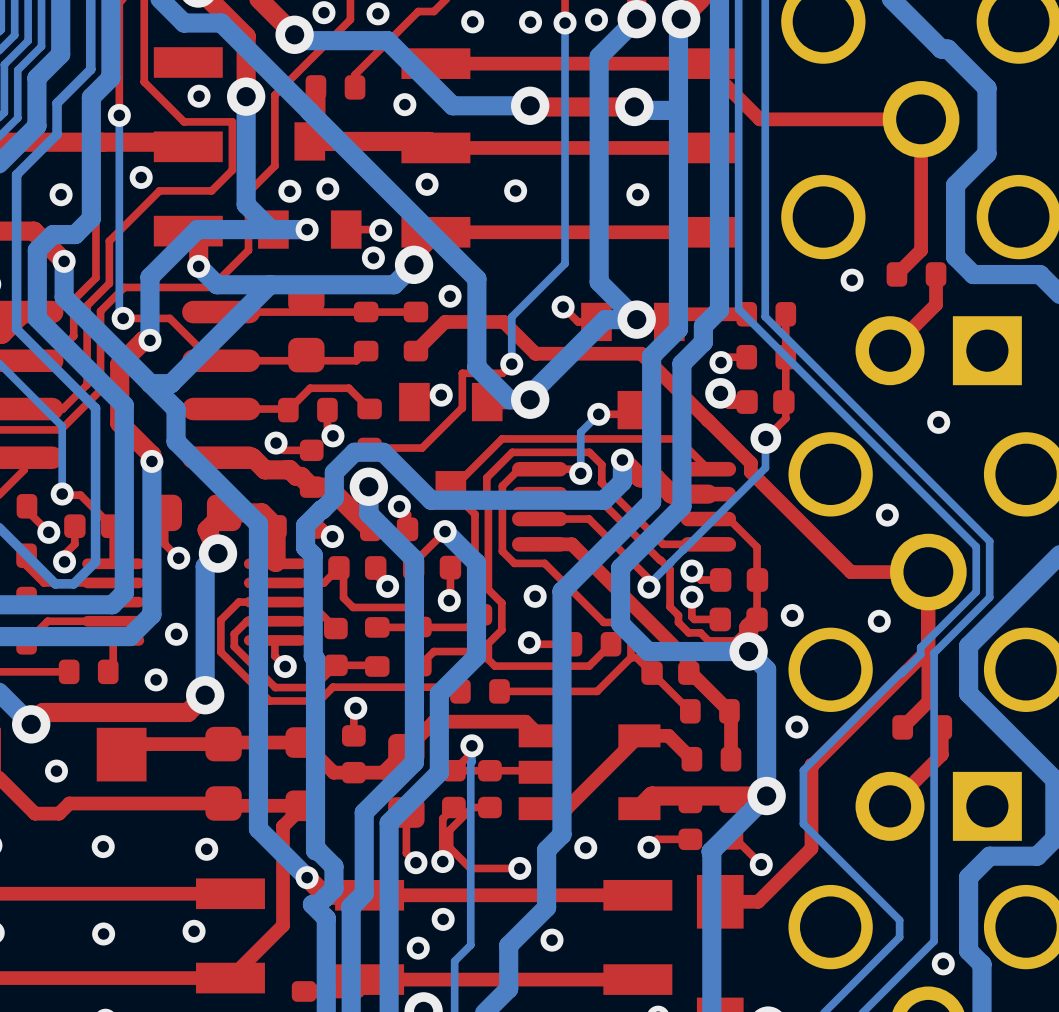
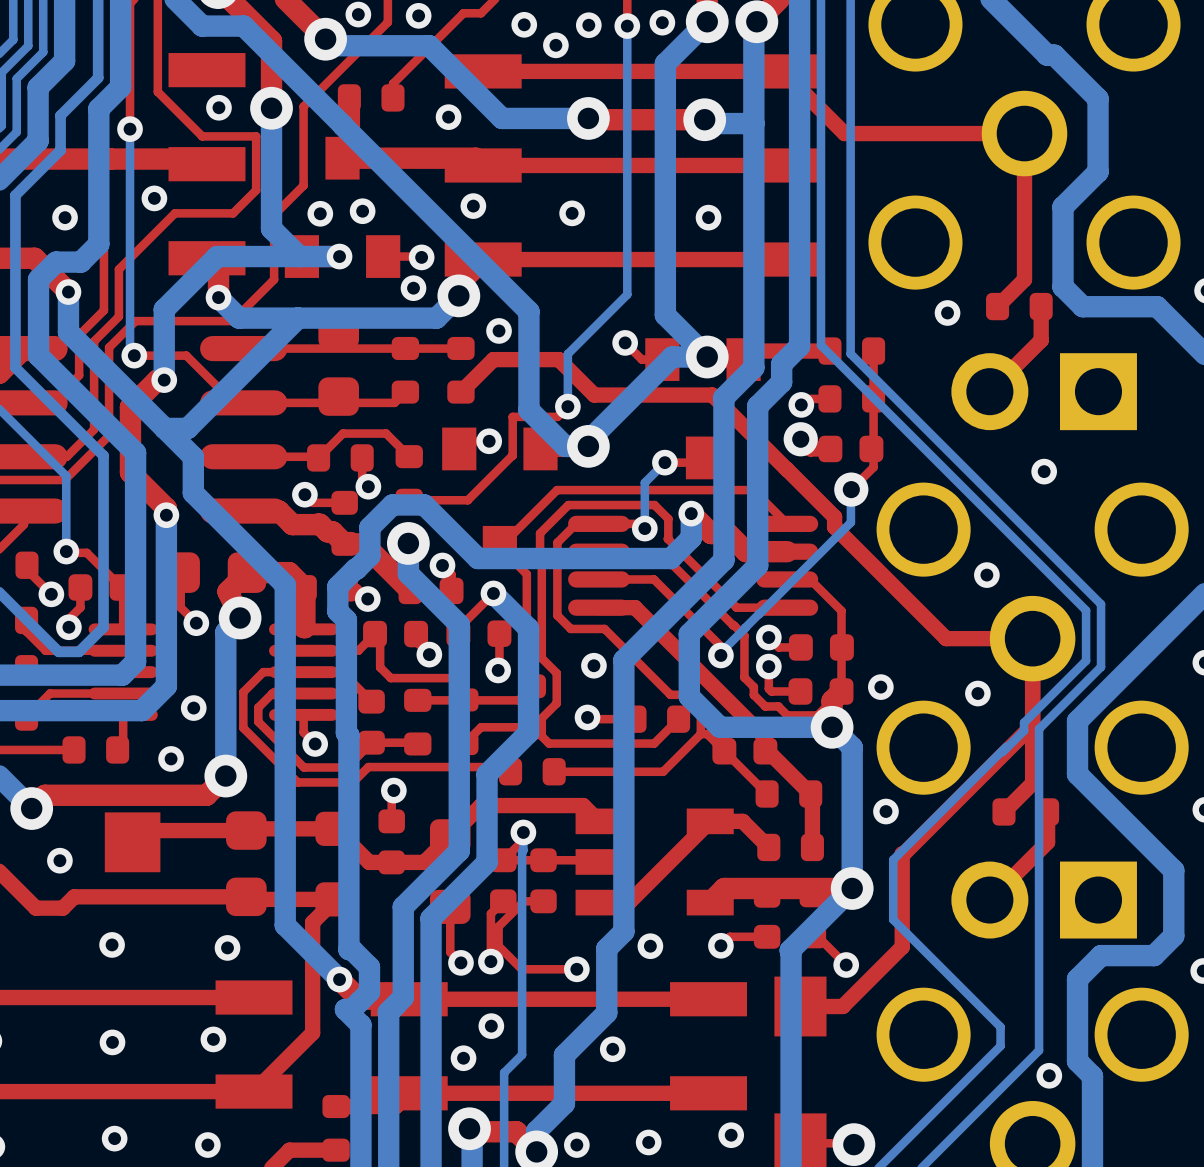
via: none -> (555, 45)

